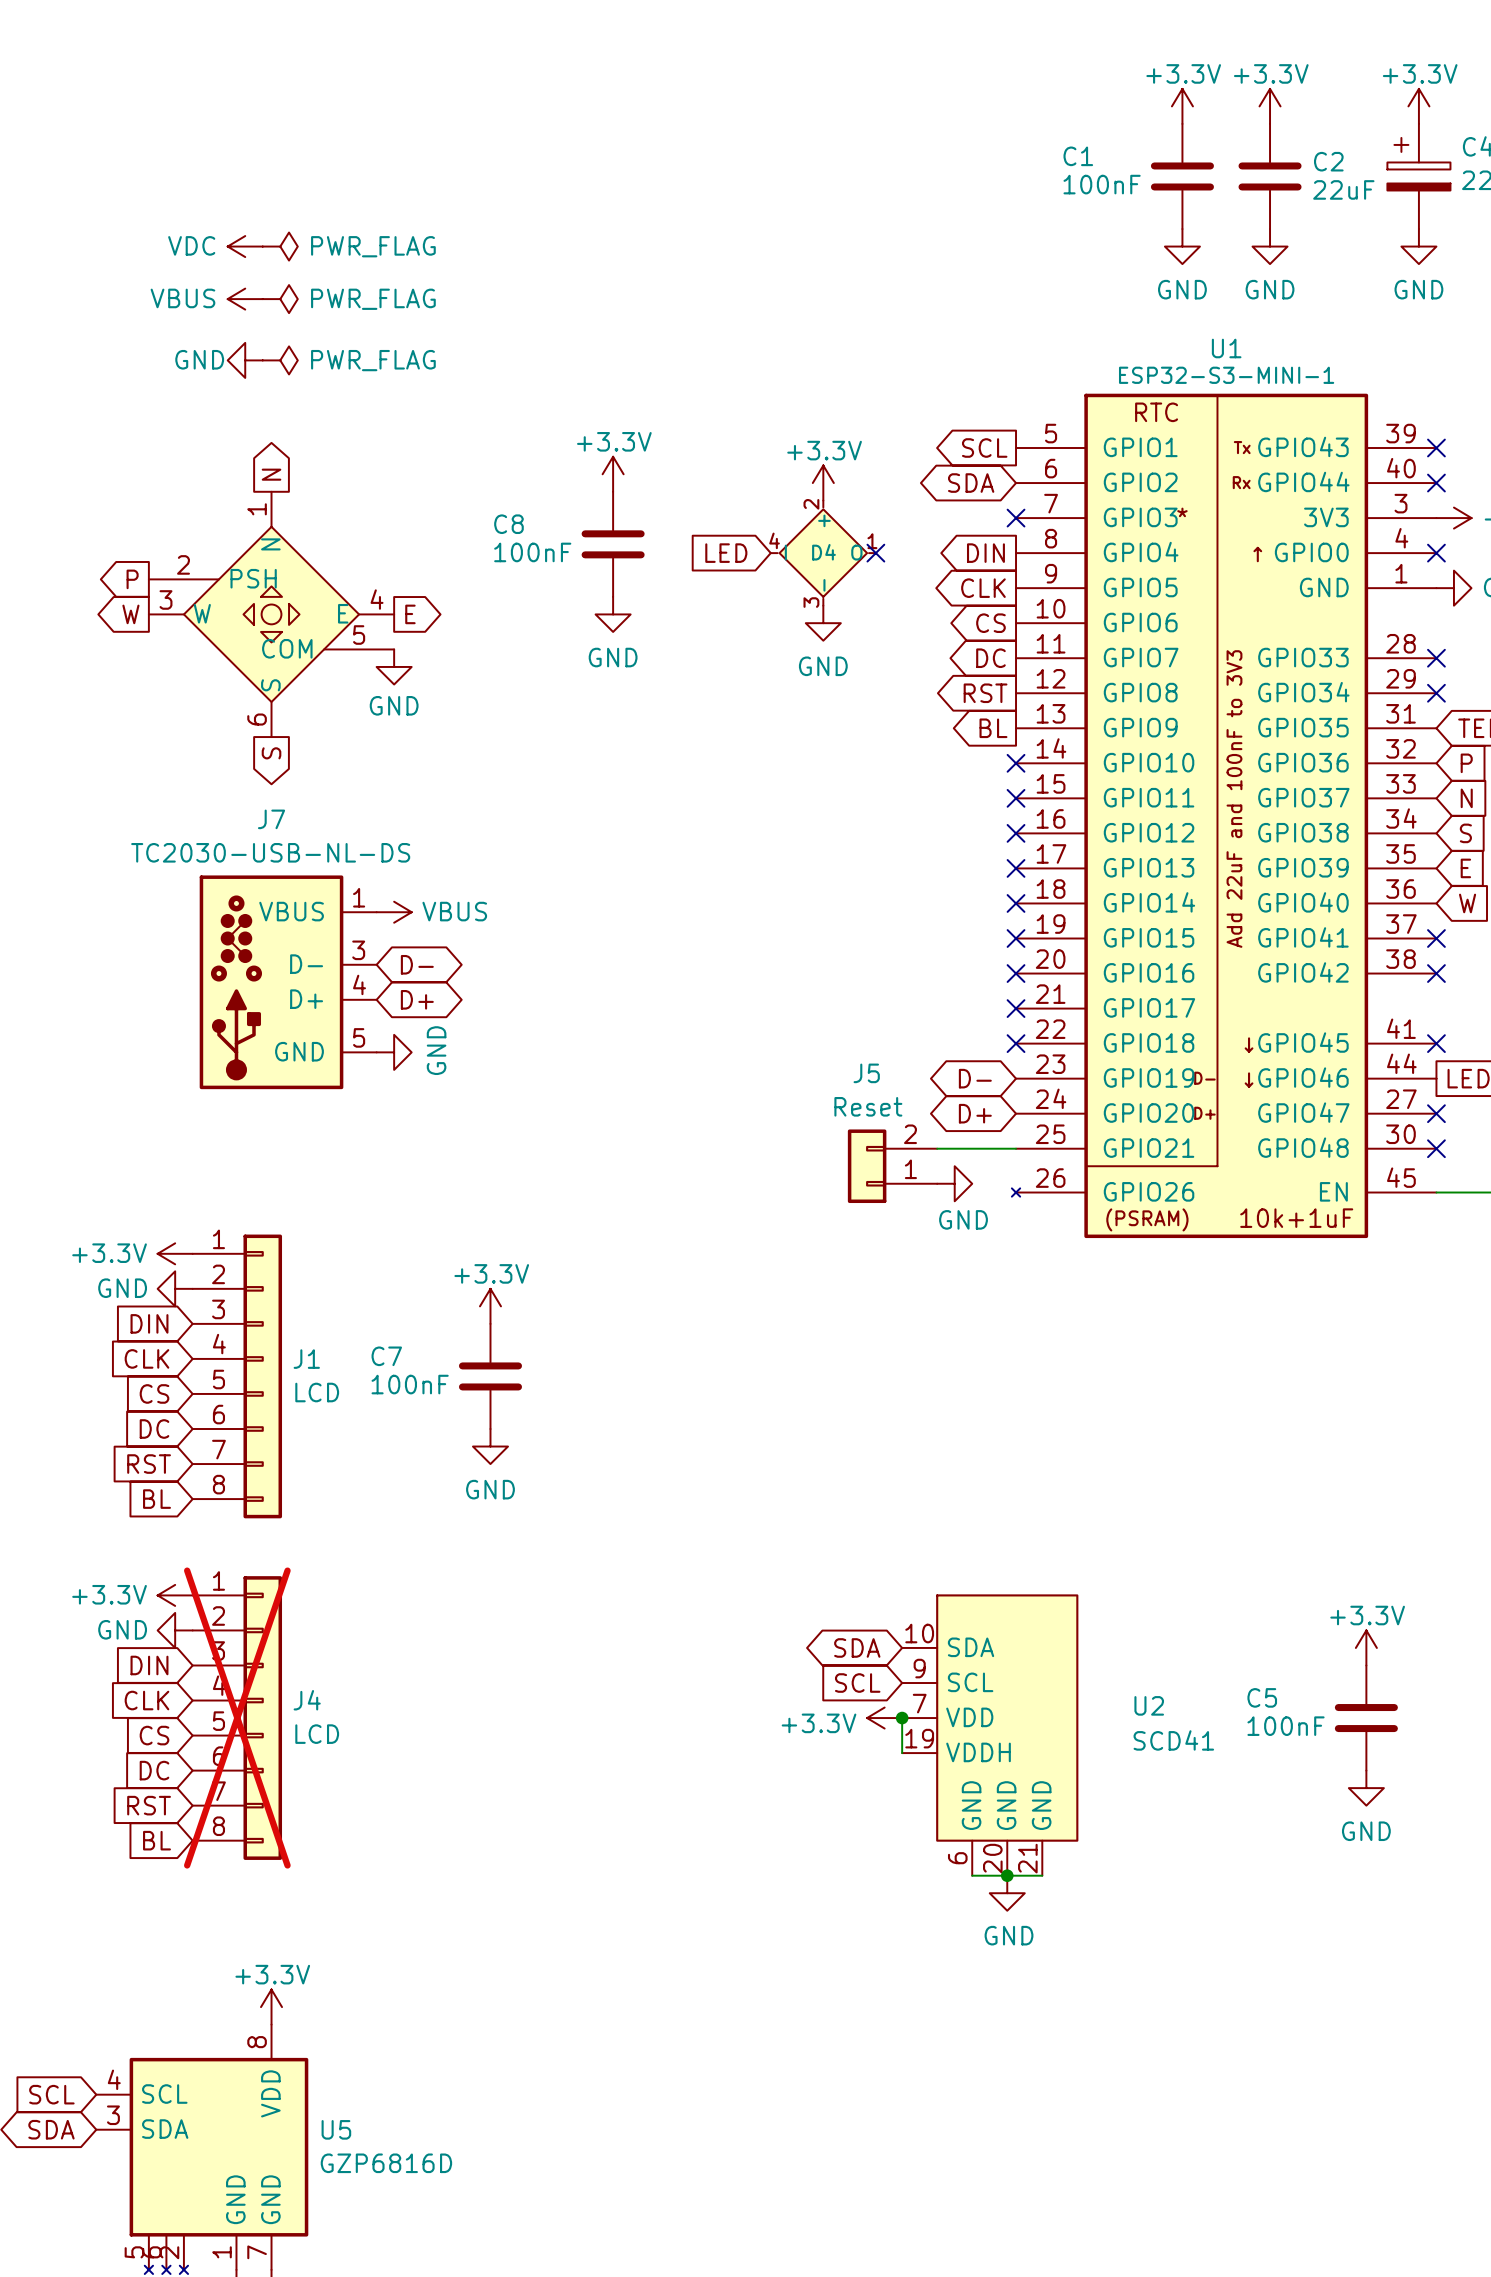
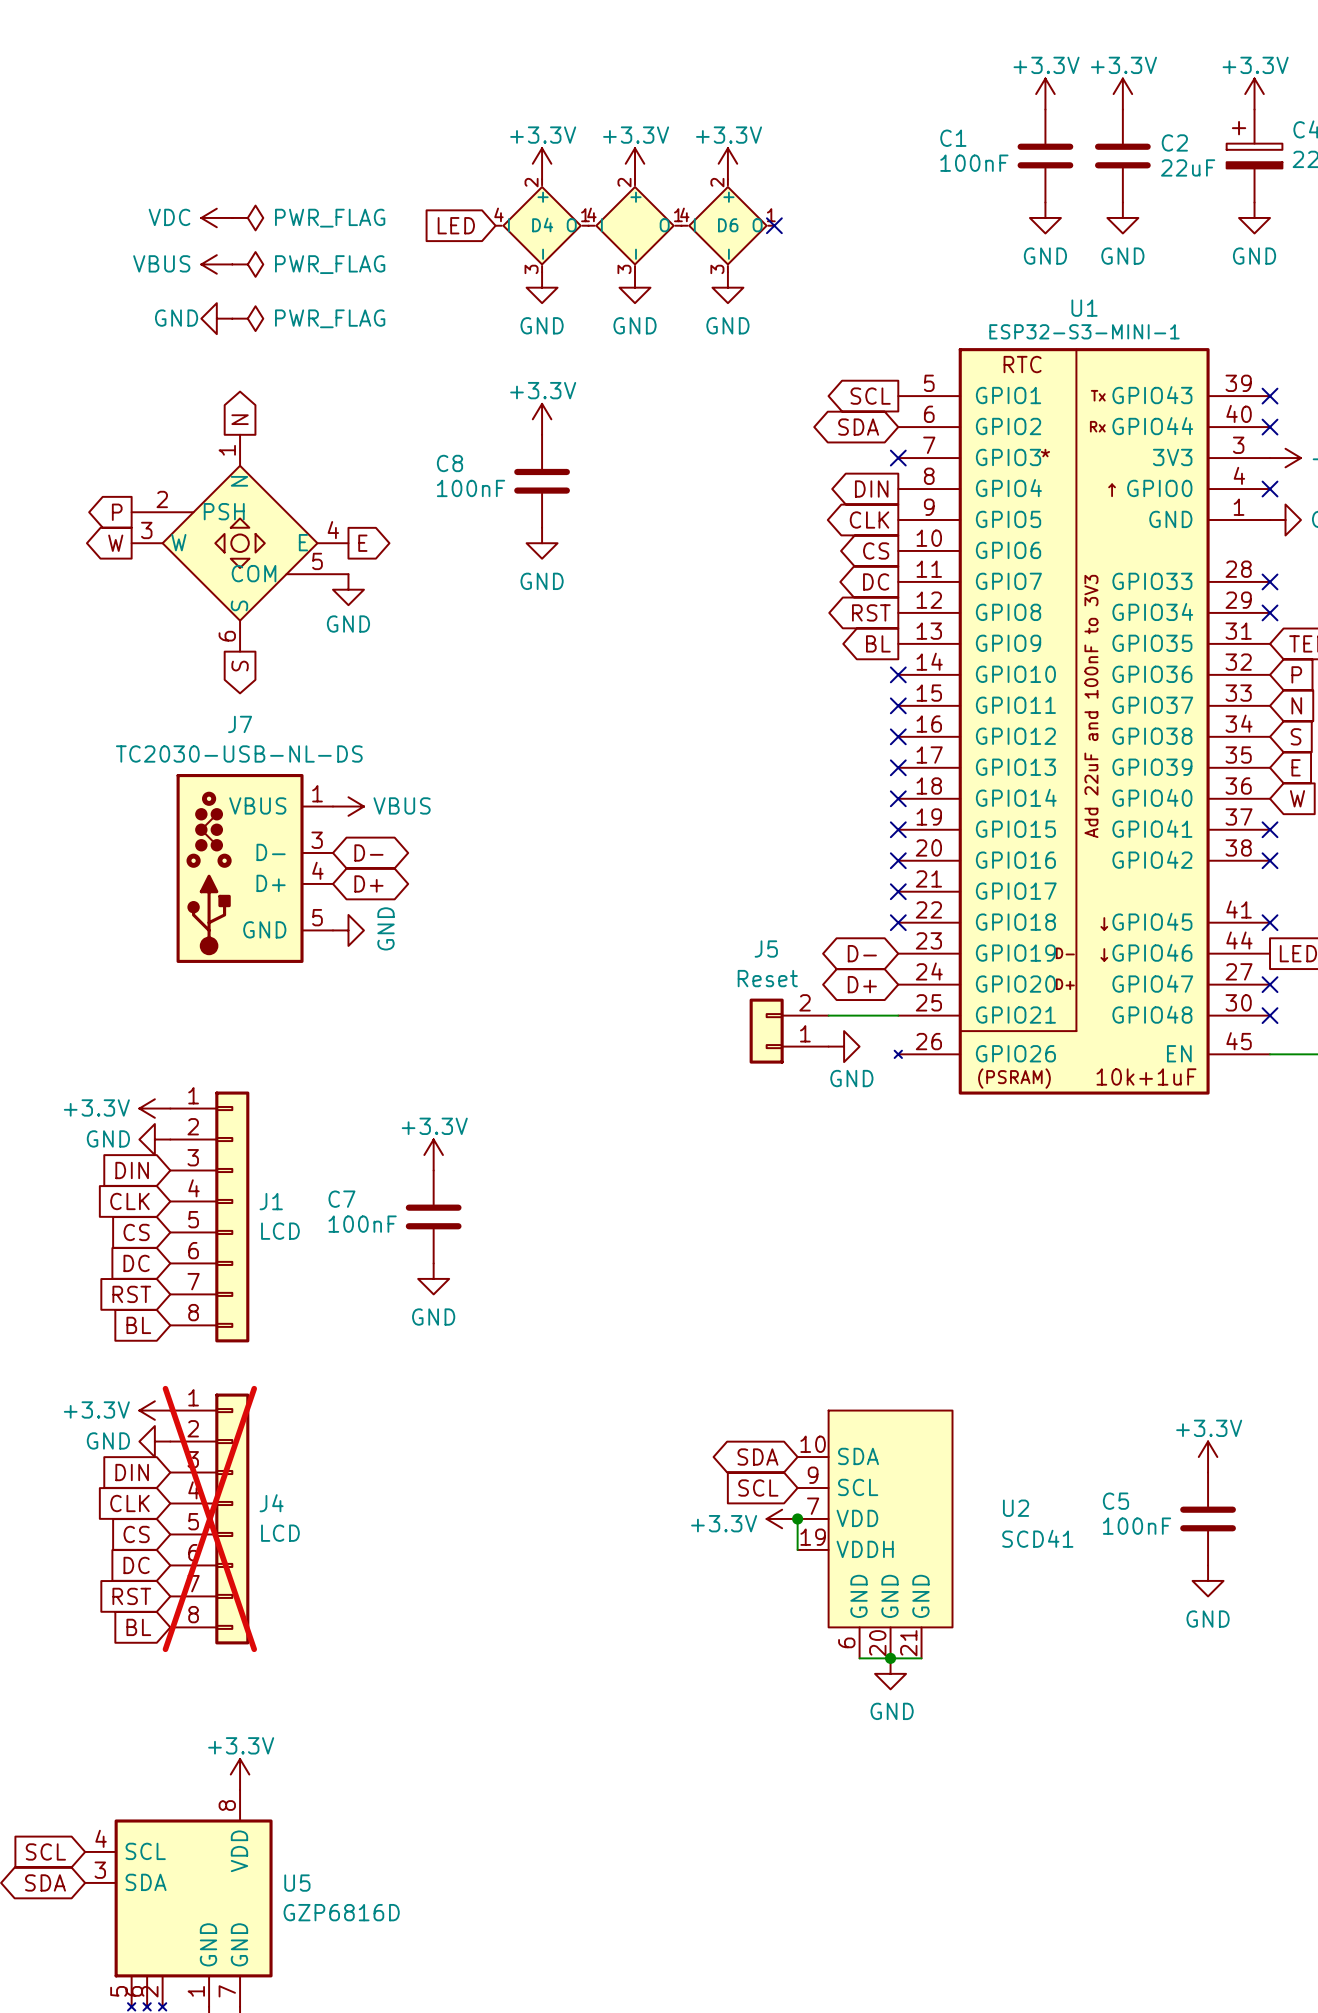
power symbol: none -> +3.3V (542, 163)
power symbol: none -> +3.3V (635, 163)
power symbol: none -> +3.3V (727, 163)
global label: none -> LED (456, 225)
part: none -> (635, 225)
D6: none -> (727, 225)
no-connect mark: none -> (774, 225)
power symbol: none -> GND (542, 287)
power symbol: none -> GND (635, 287)
power symbol: none -> GND (727, 287)
power symbol: +3.3V (823, 483) -> none
global label: LED (726, 553) -> none
D4 position: (823, 553) -> (542, 225)
no-connect mark: (875, 553) -> none
power symbol: GND (823, 623) -> none

